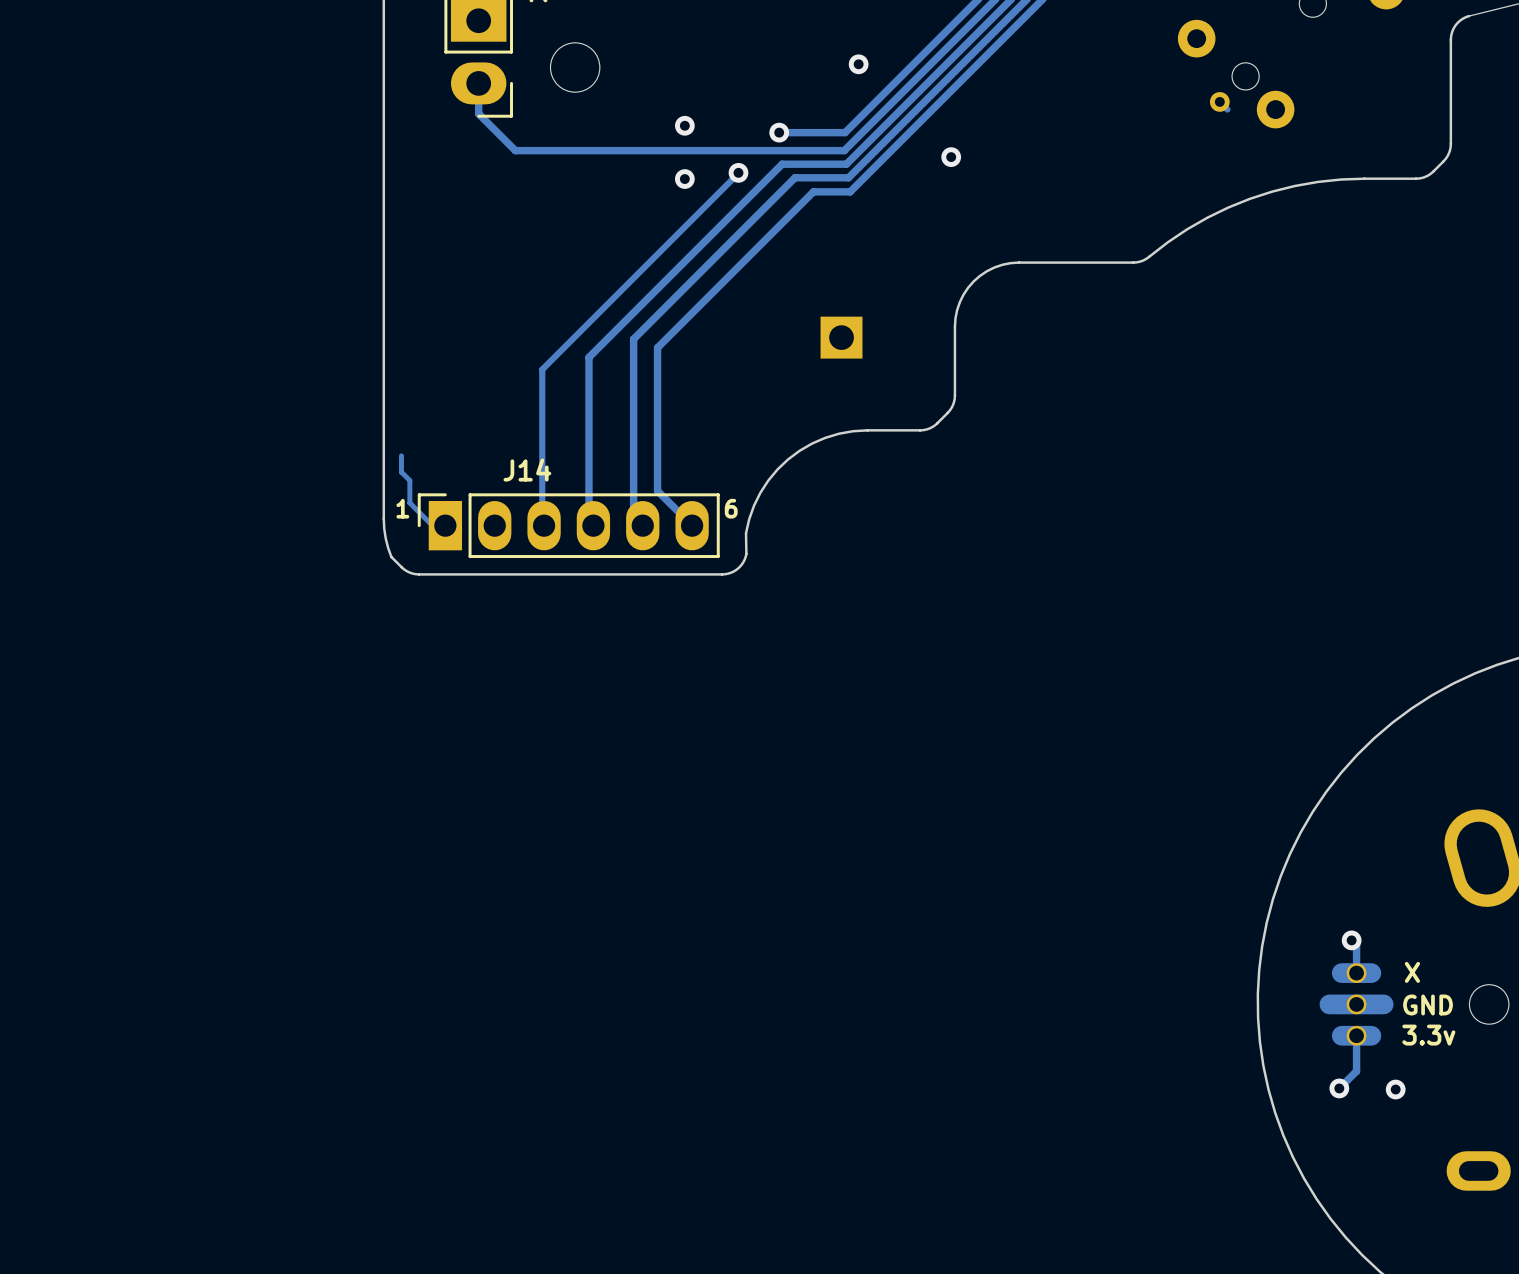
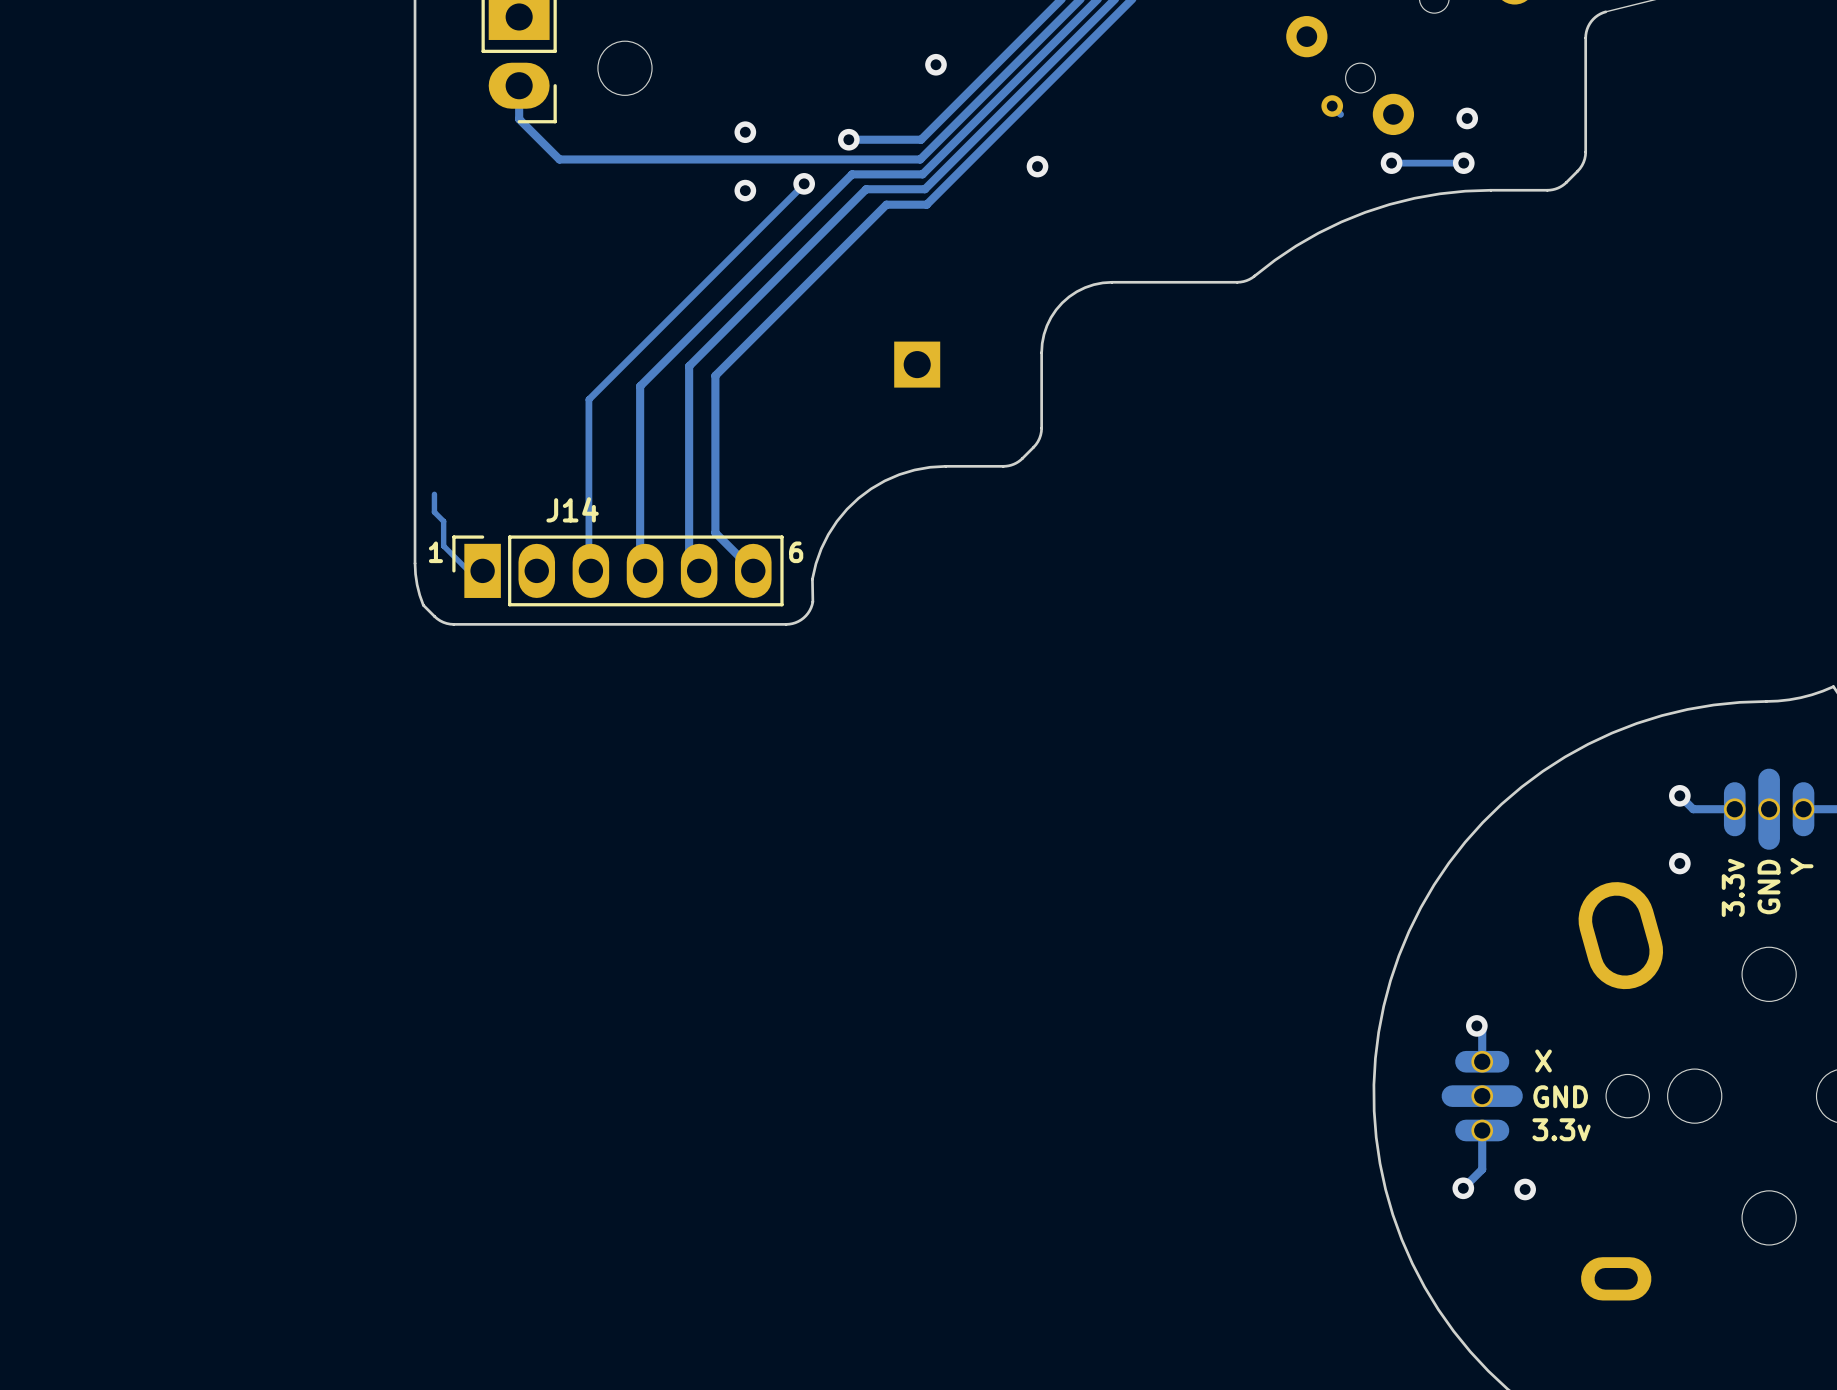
via: none -> (1467, 118)
via: none -> (1391, 163)
track: none -> (1463, 163) (1391, 163)
via: none -> (1463, 163)

